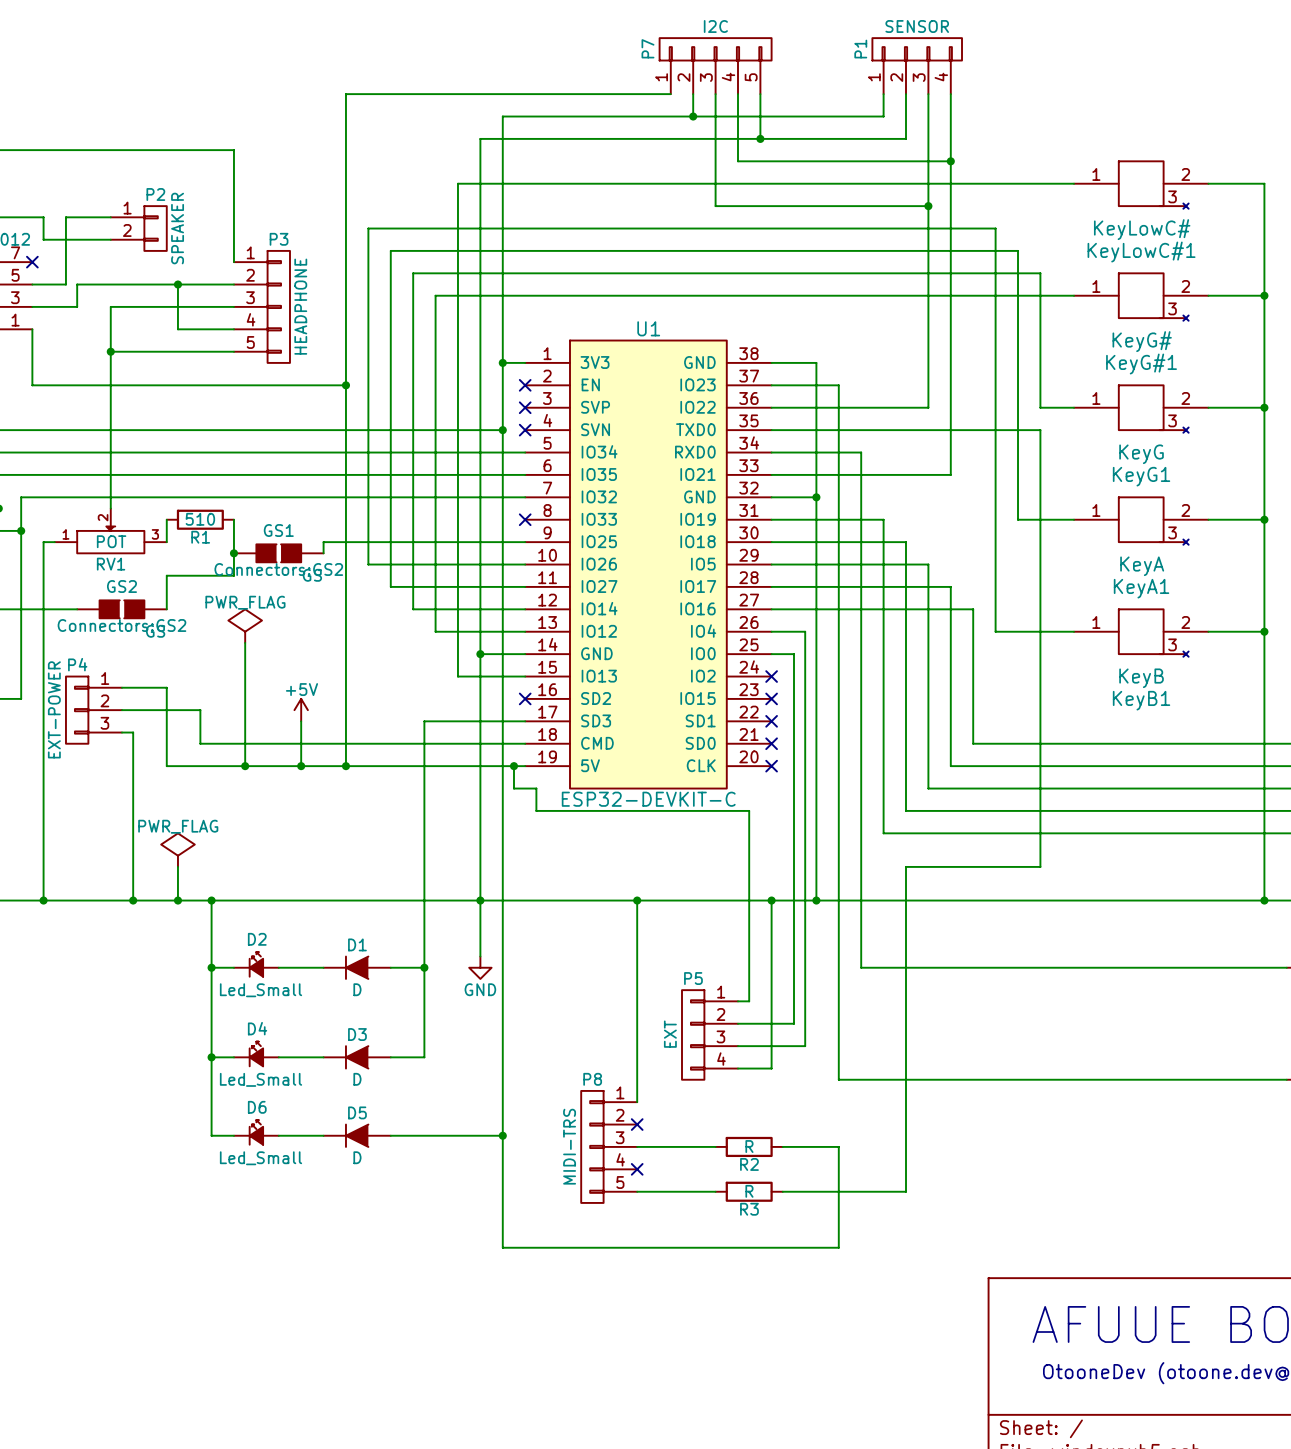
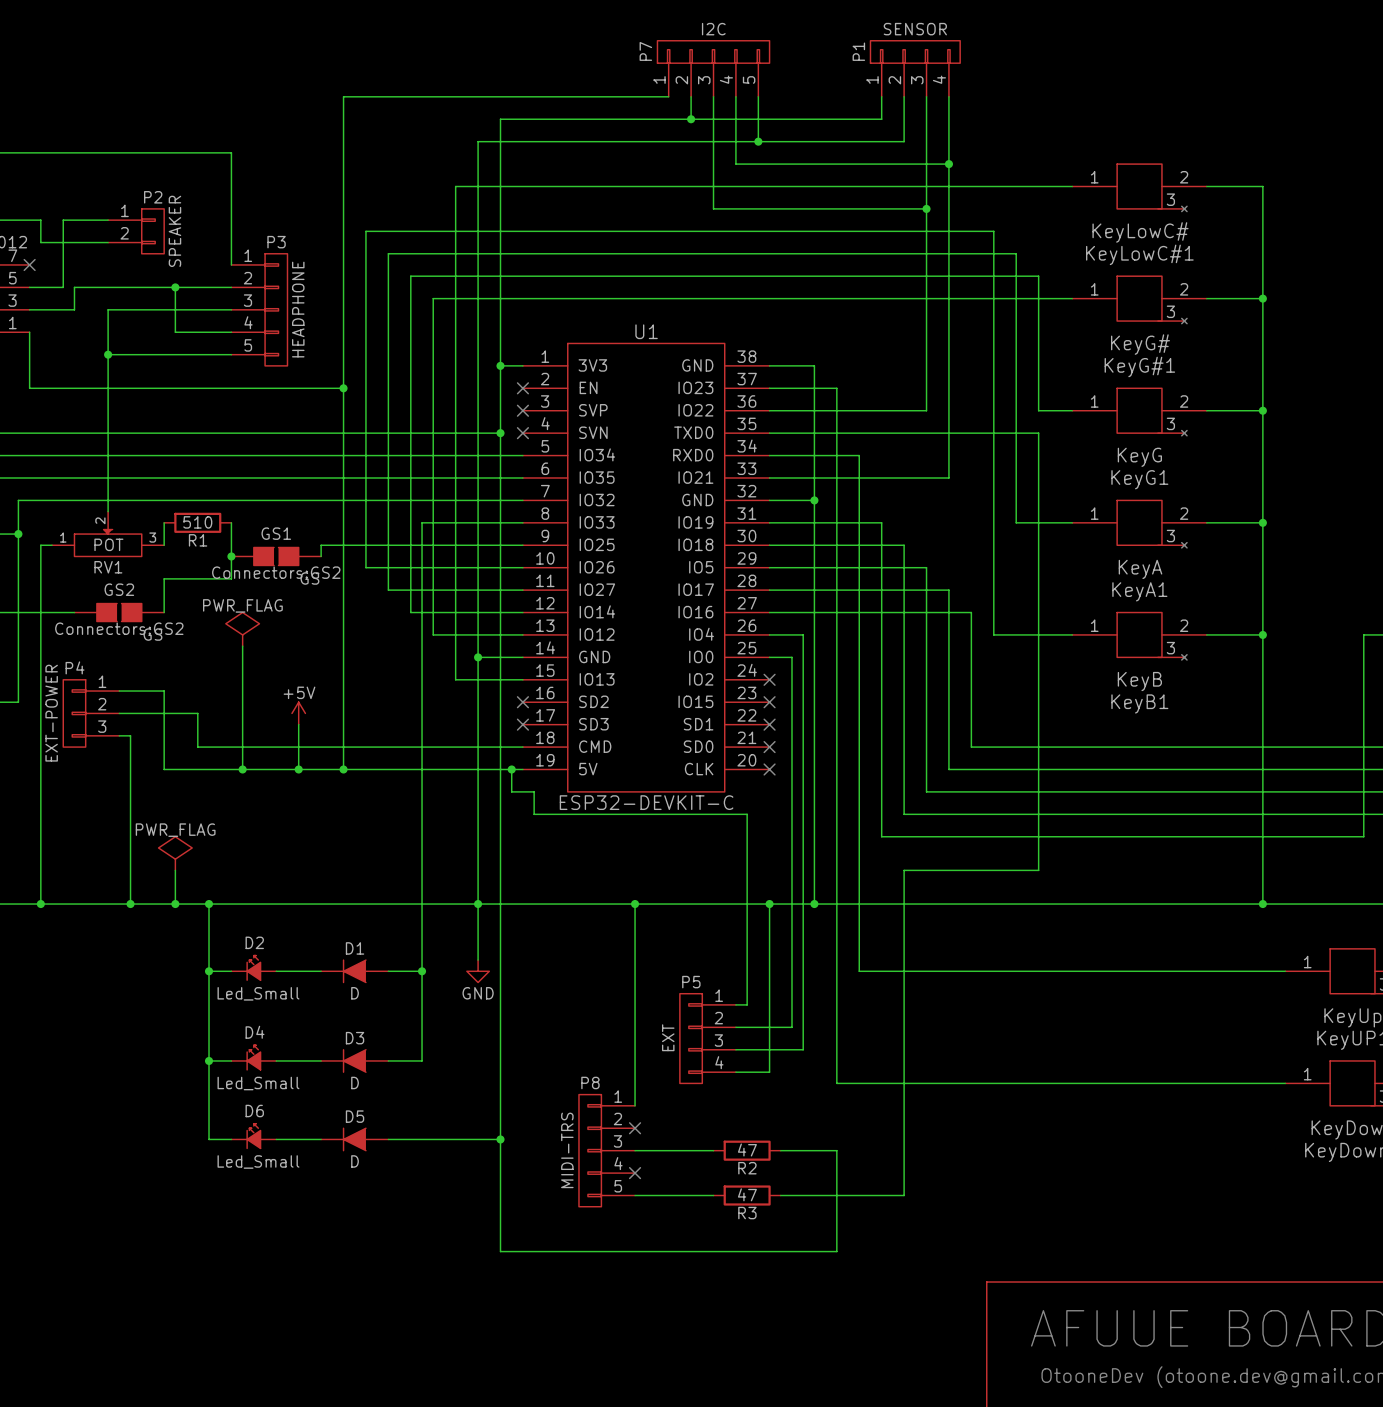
no-connect mark: (525, 519) -> none
wire: (424, 721) (525, 721) -> (422, 724) (422, 522) (522, 522)
no-connect mark: none -> (522, 724)
R2 value: R (749, 1146) -> 47 (747, 1149)
R3 value: R (749, 1191) -> 47 (747, 1194)

